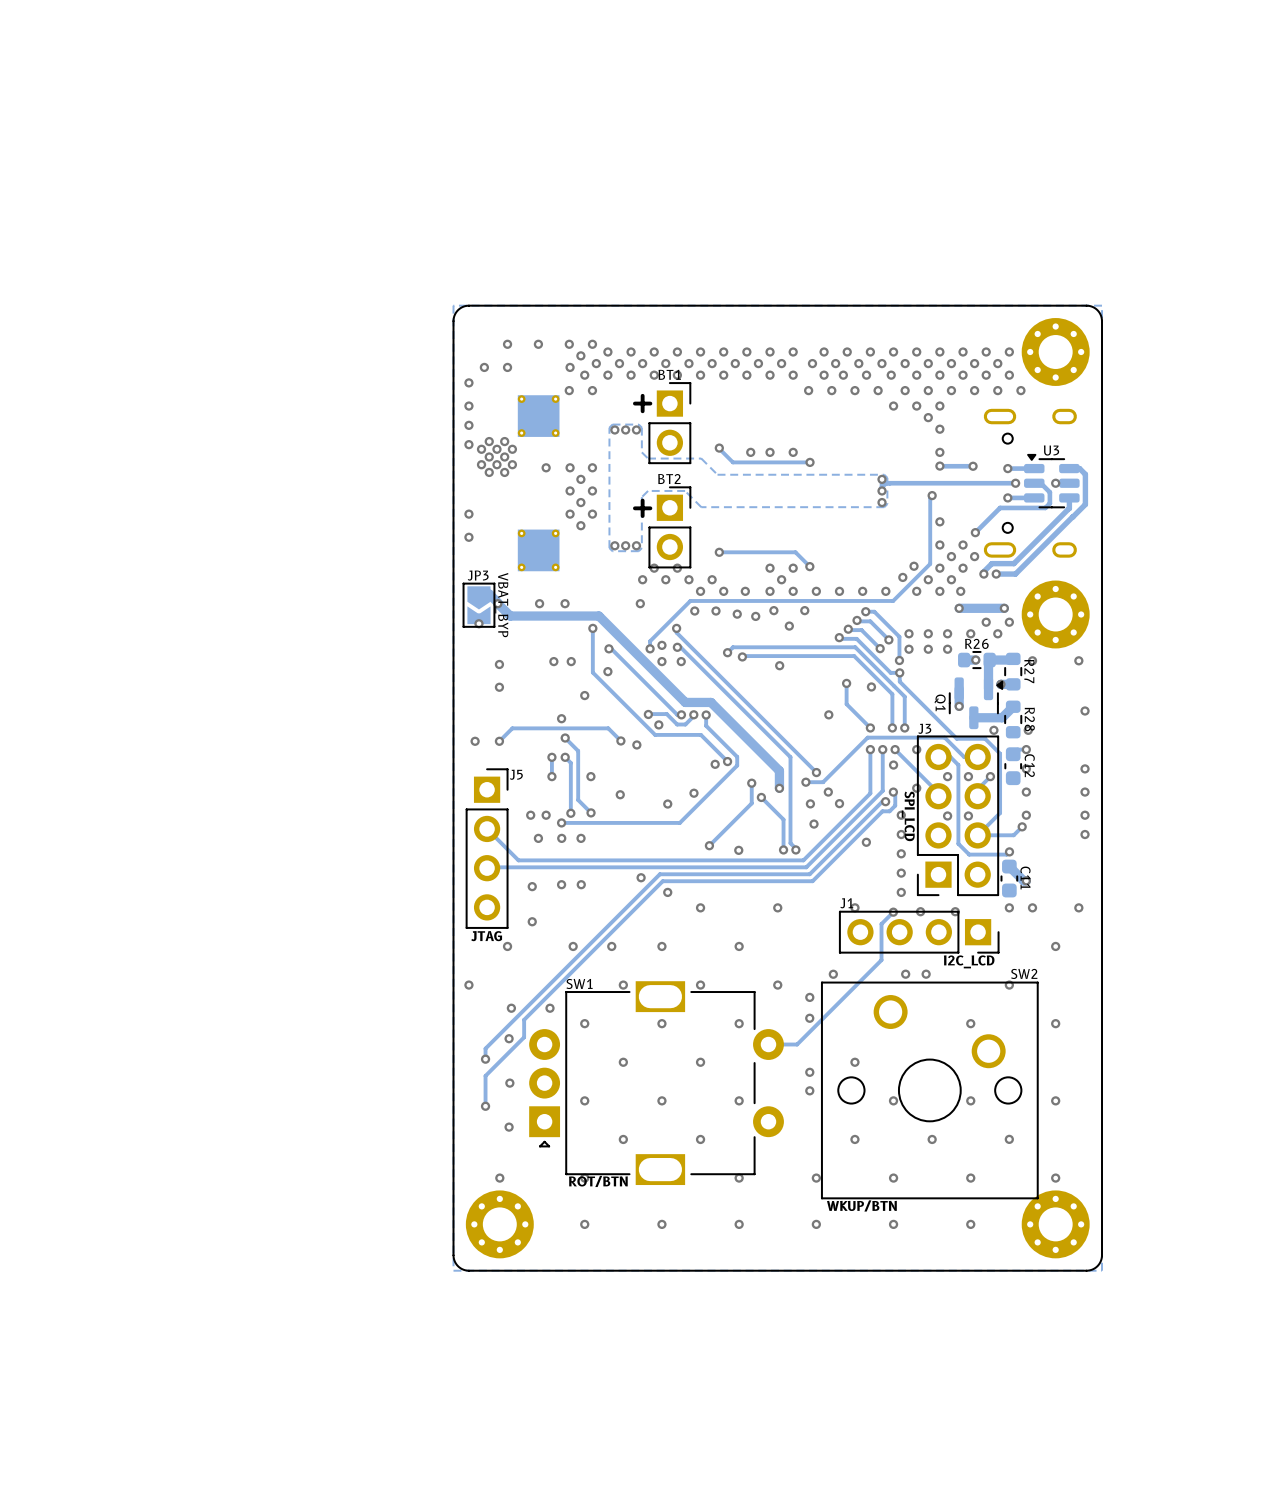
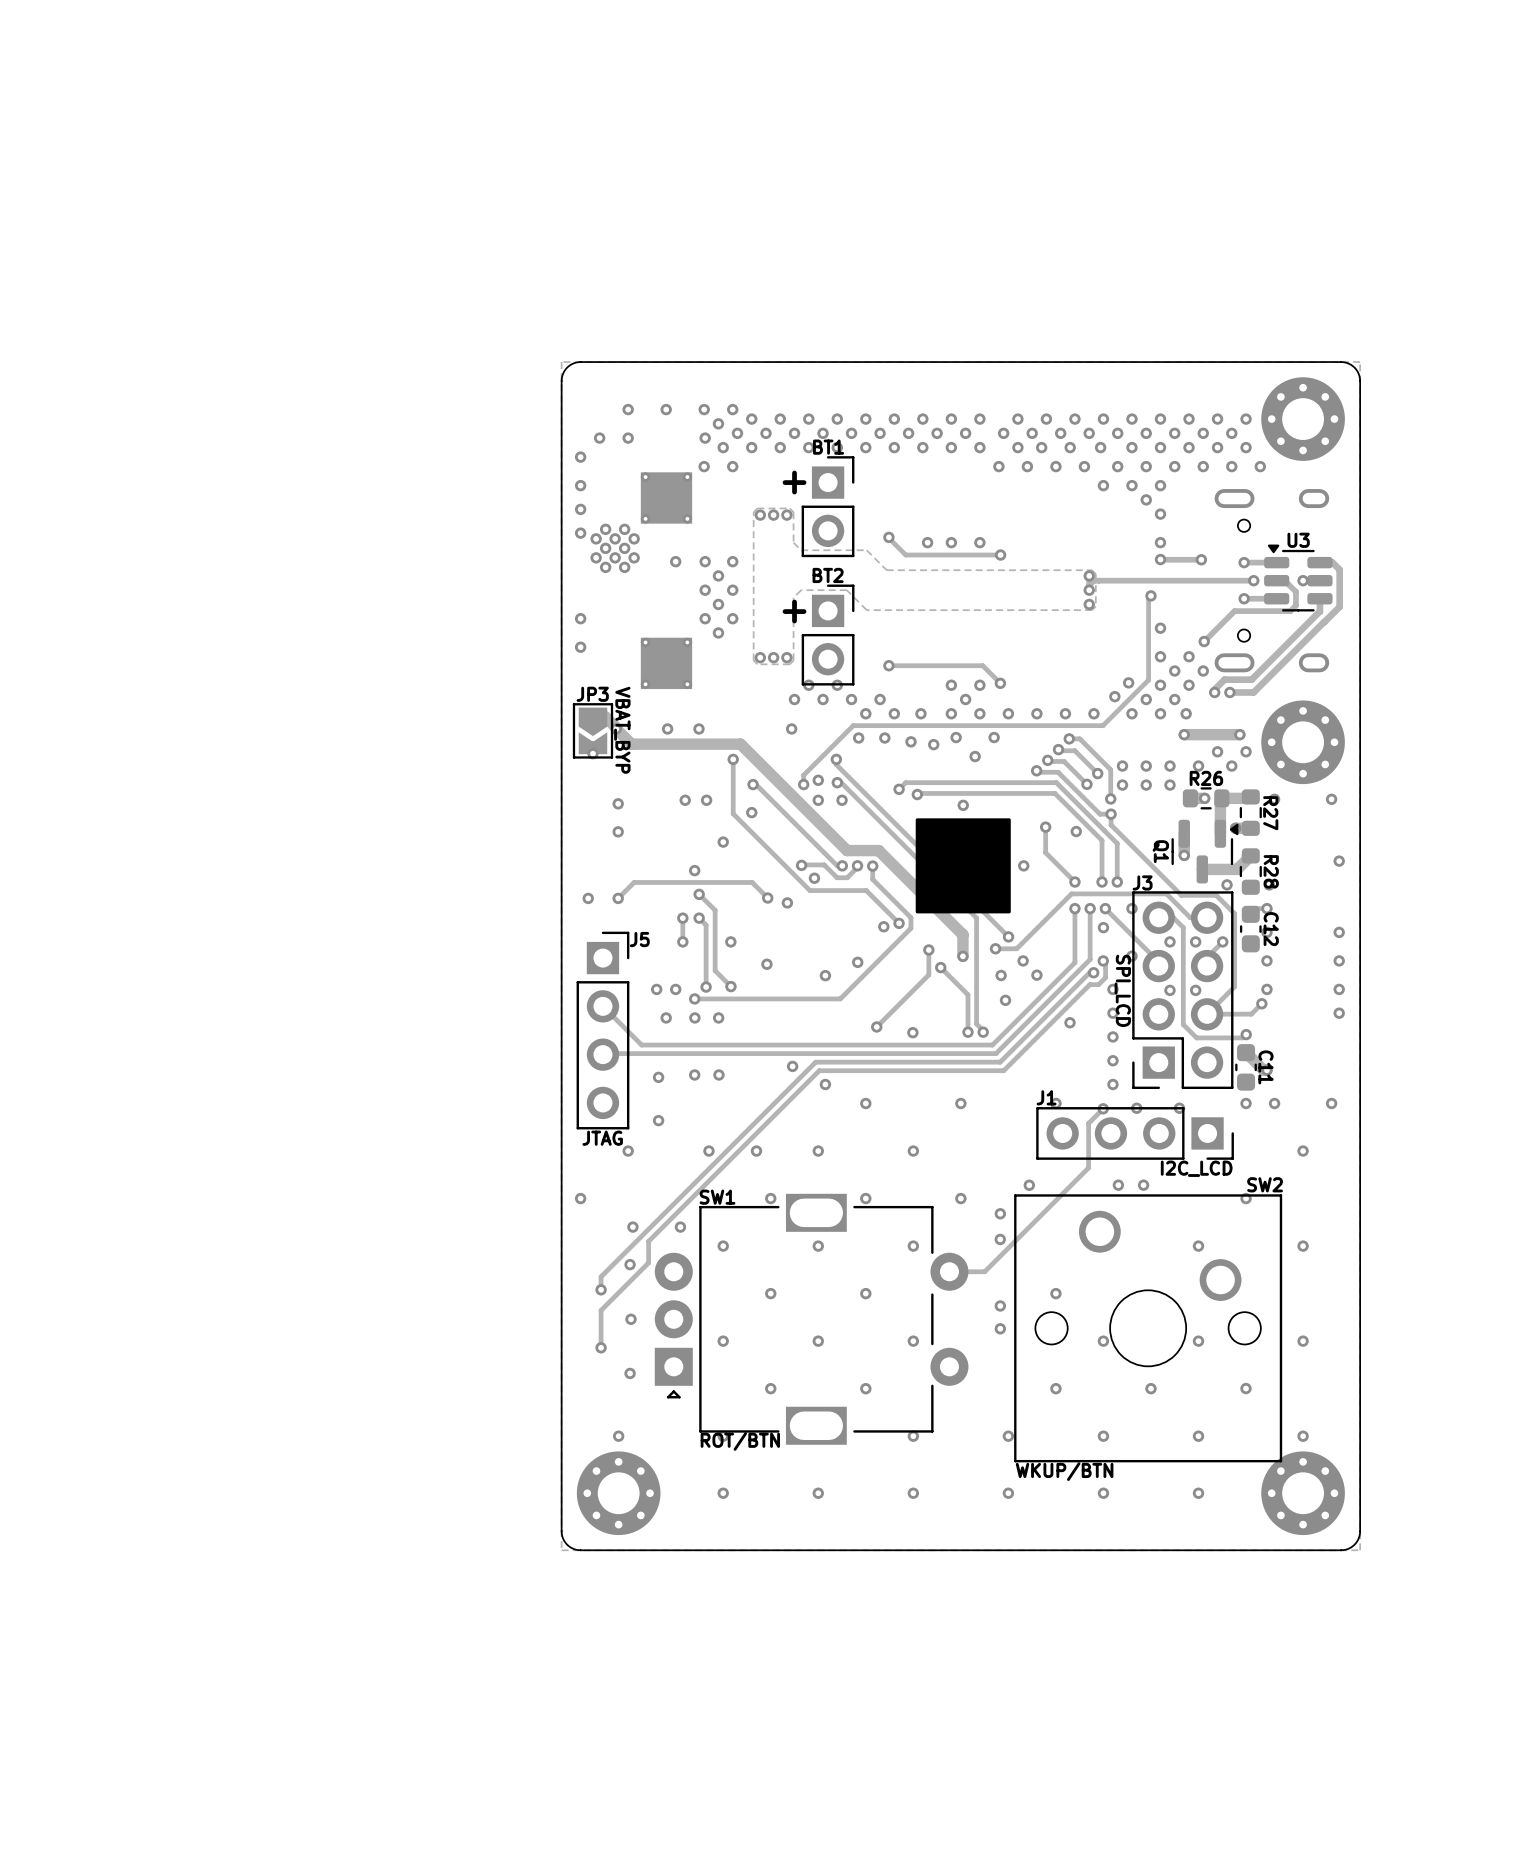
drawing: none -> [915, 818, 1011, 914]

